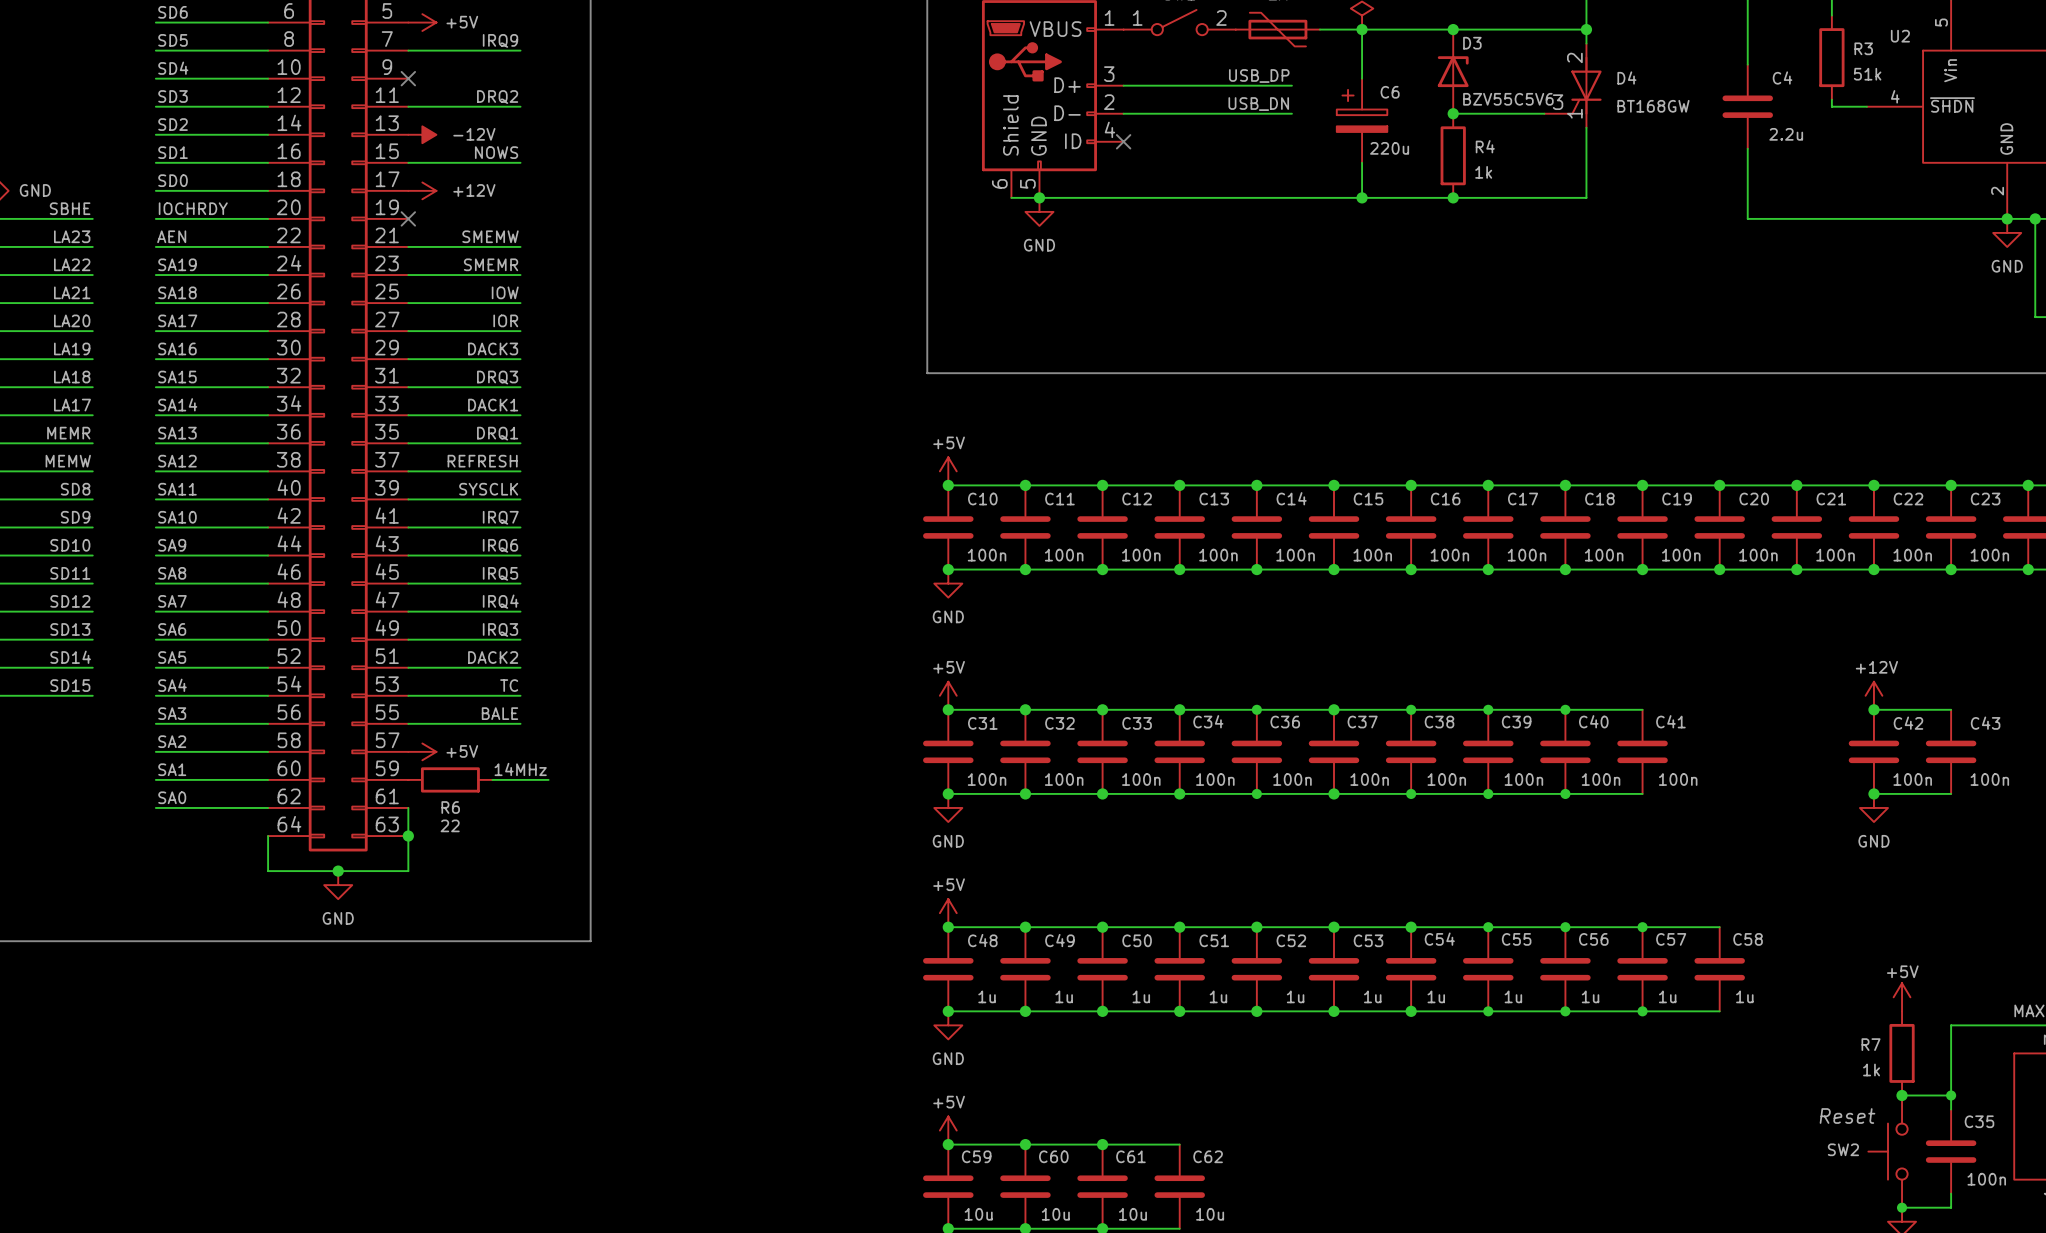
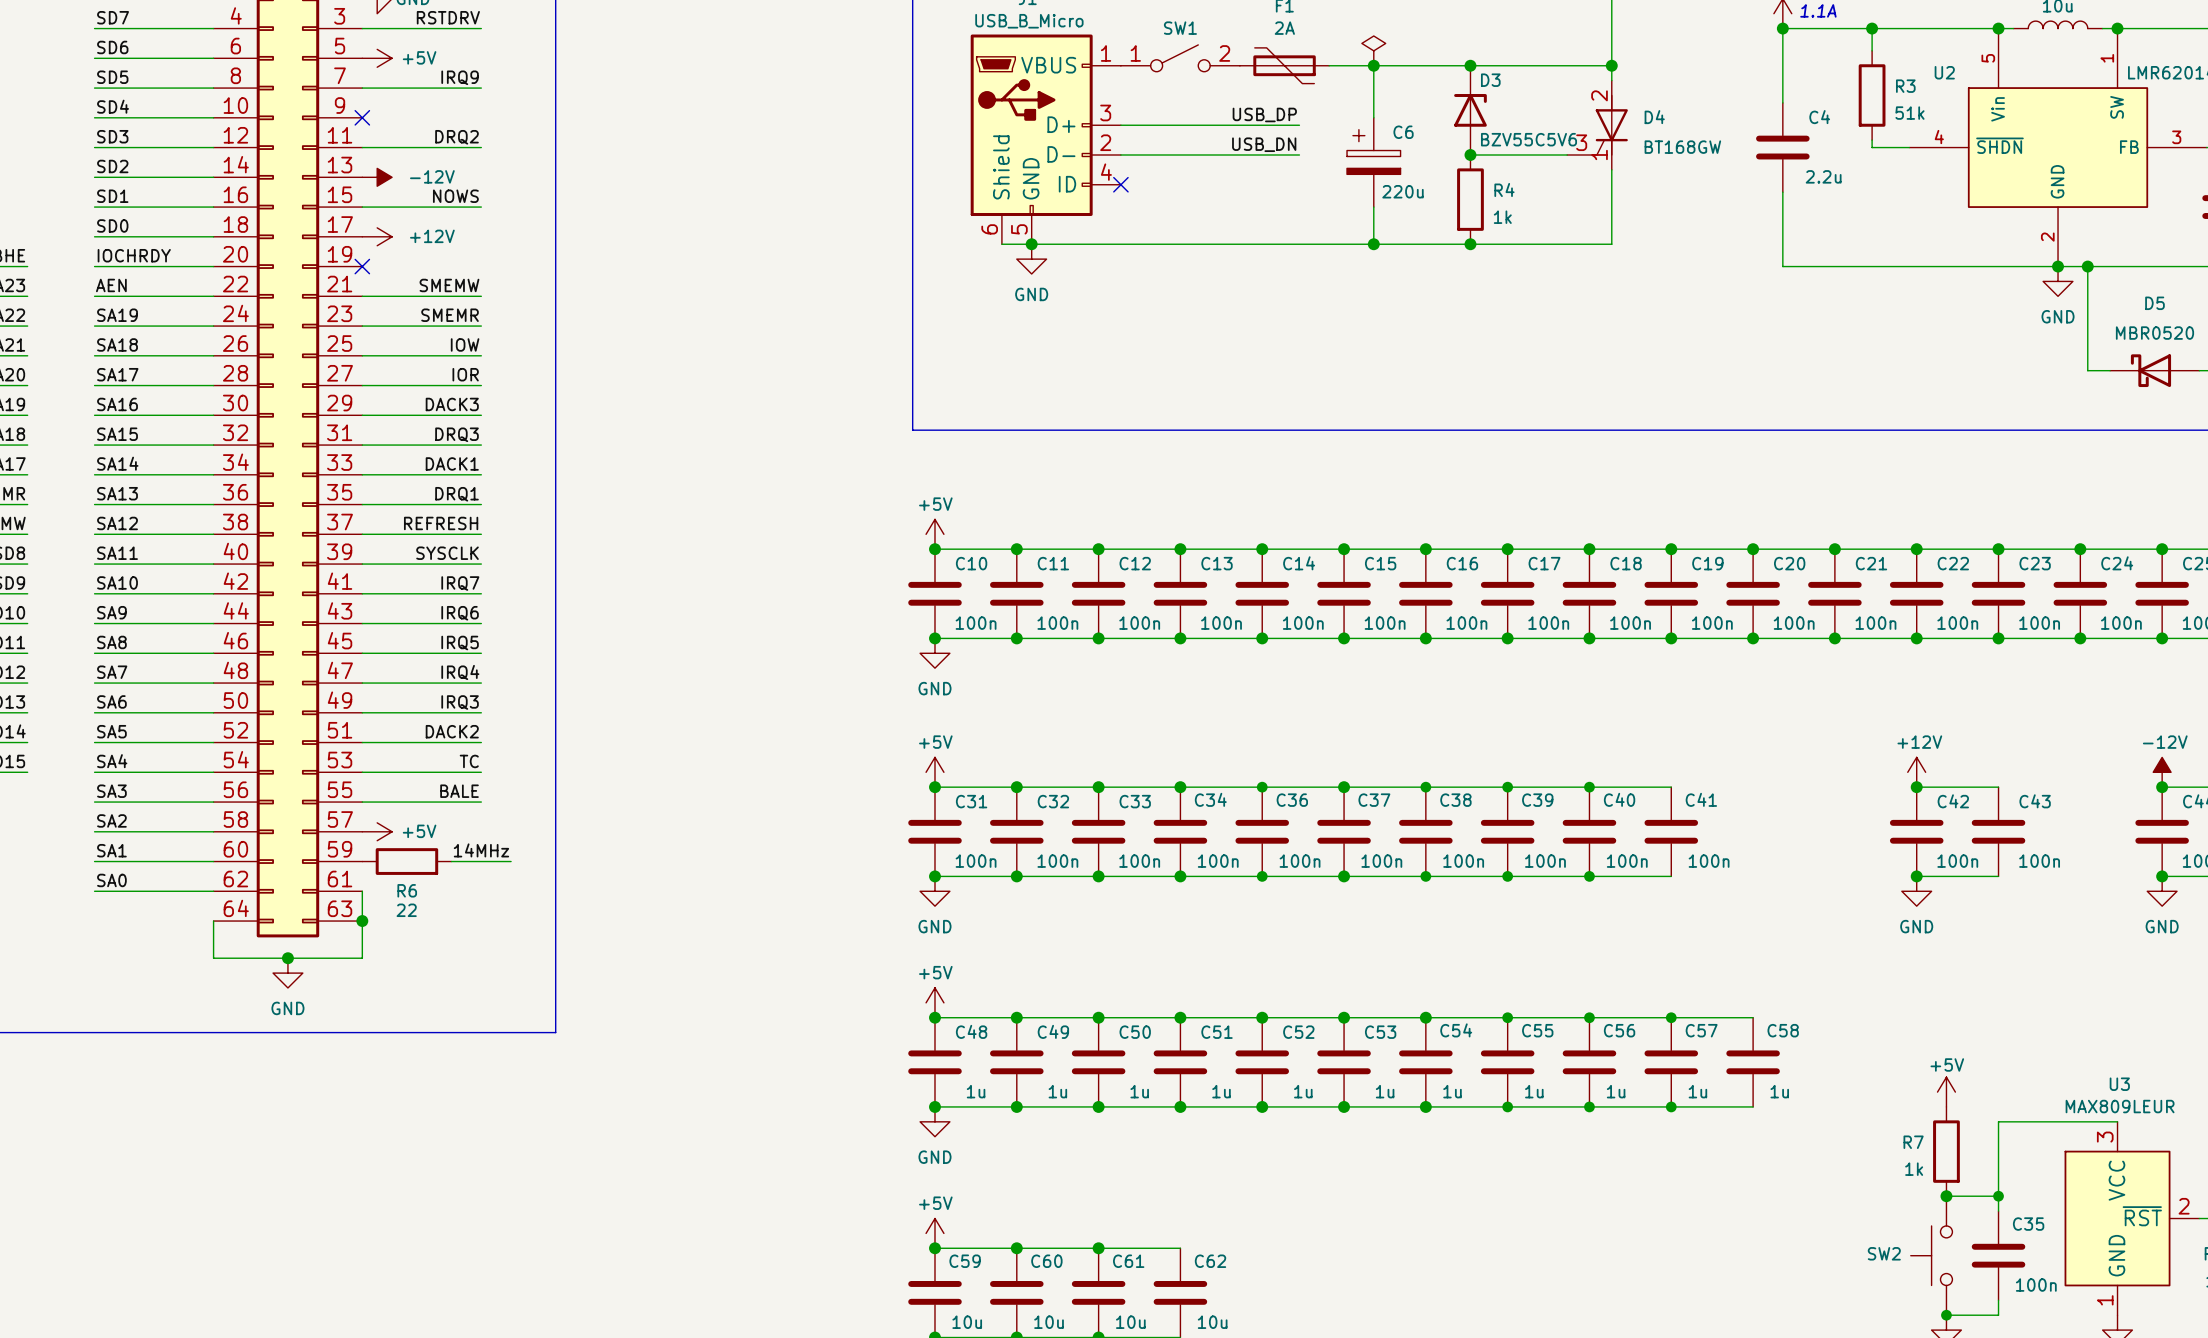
SW2 text: Reset (1847, 1116) -> none

